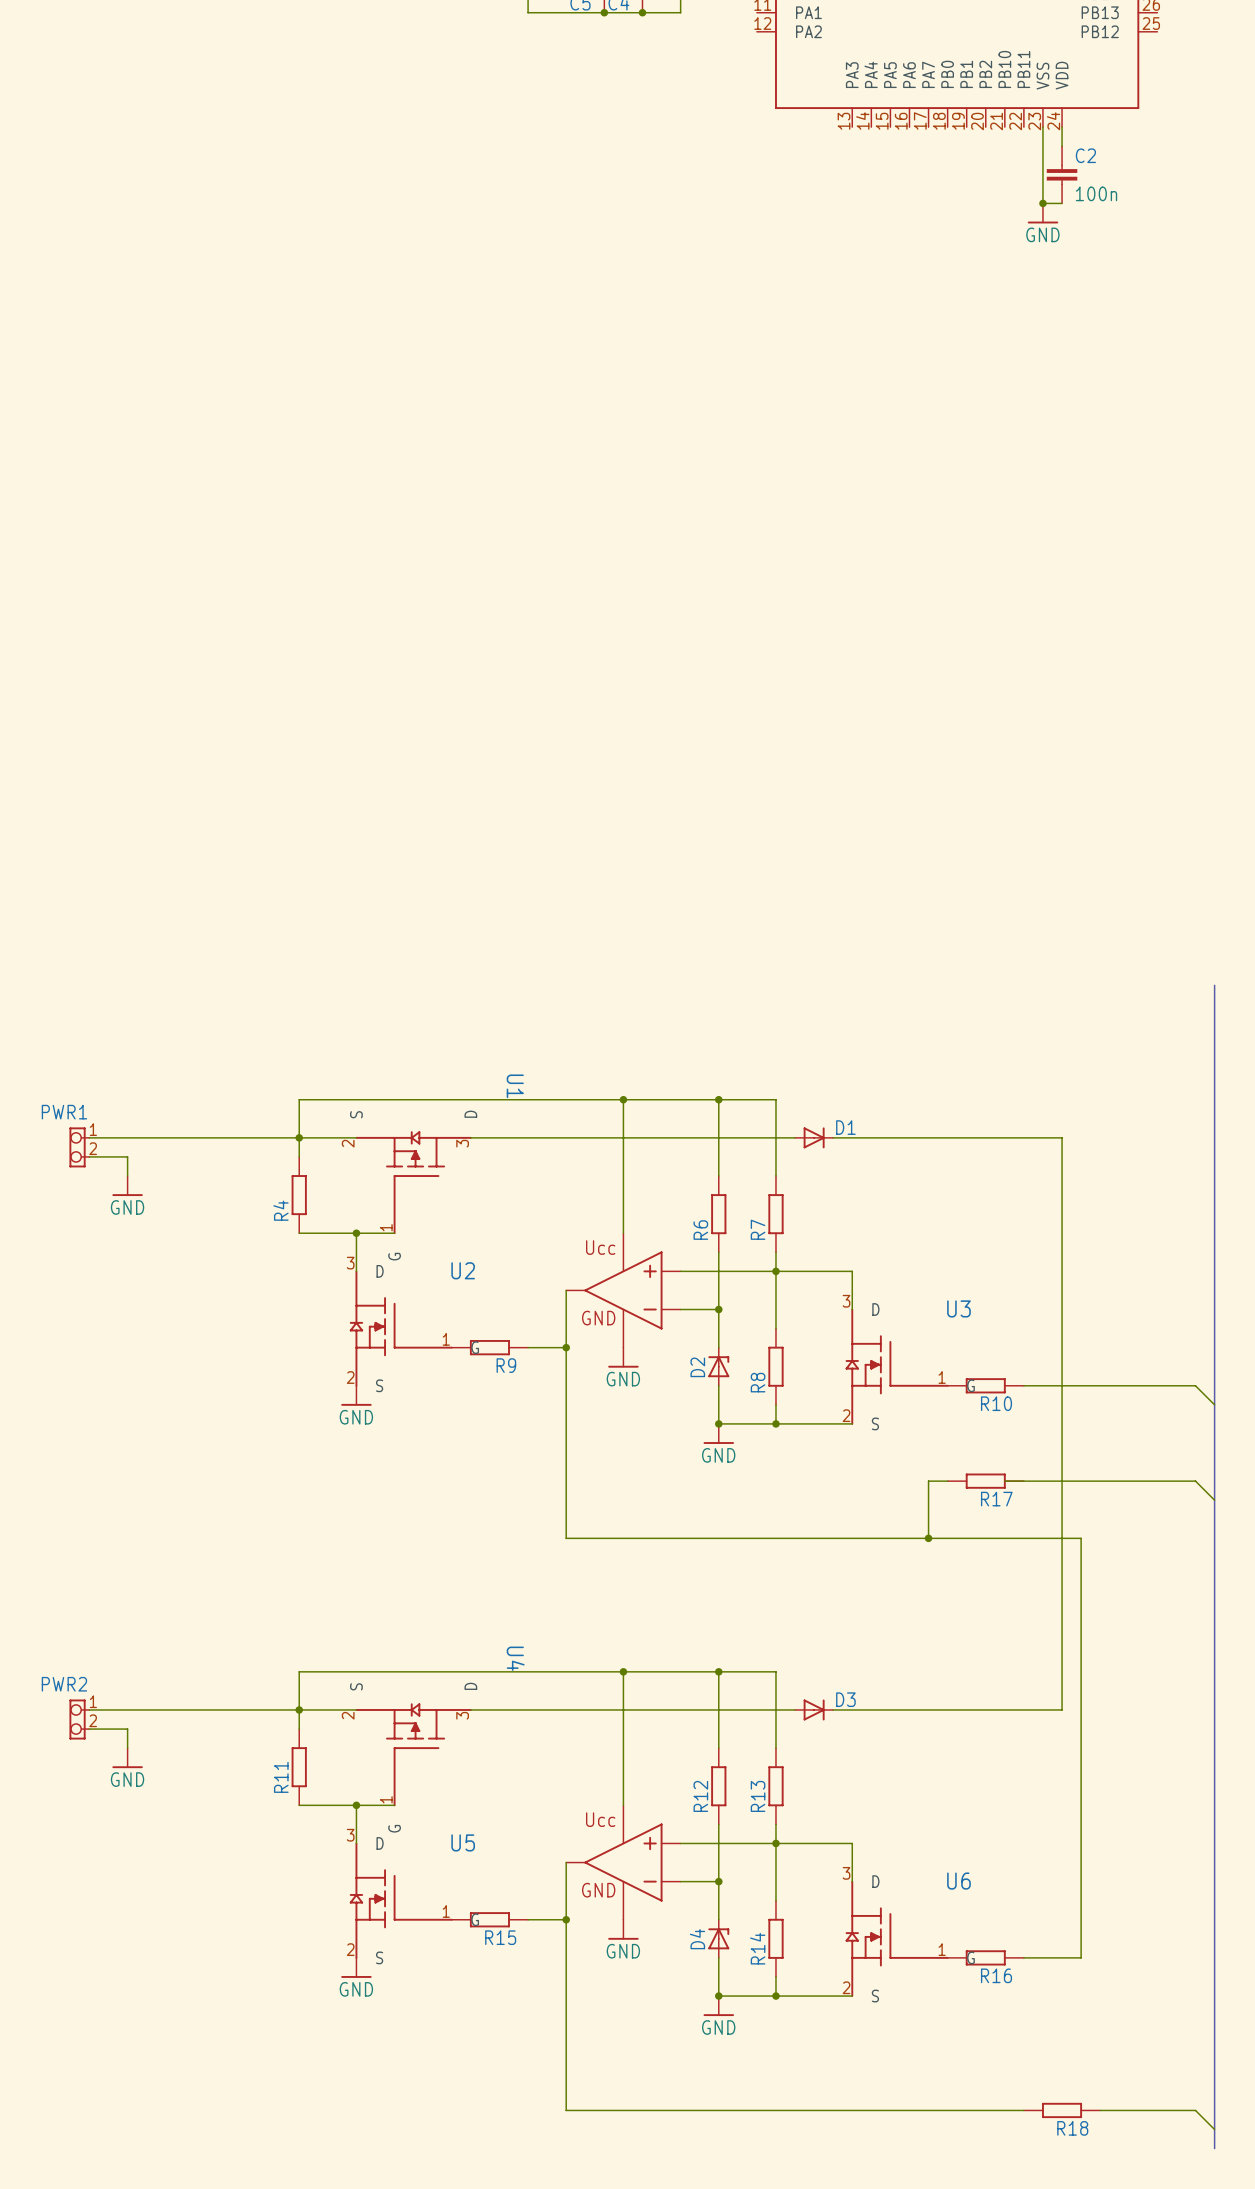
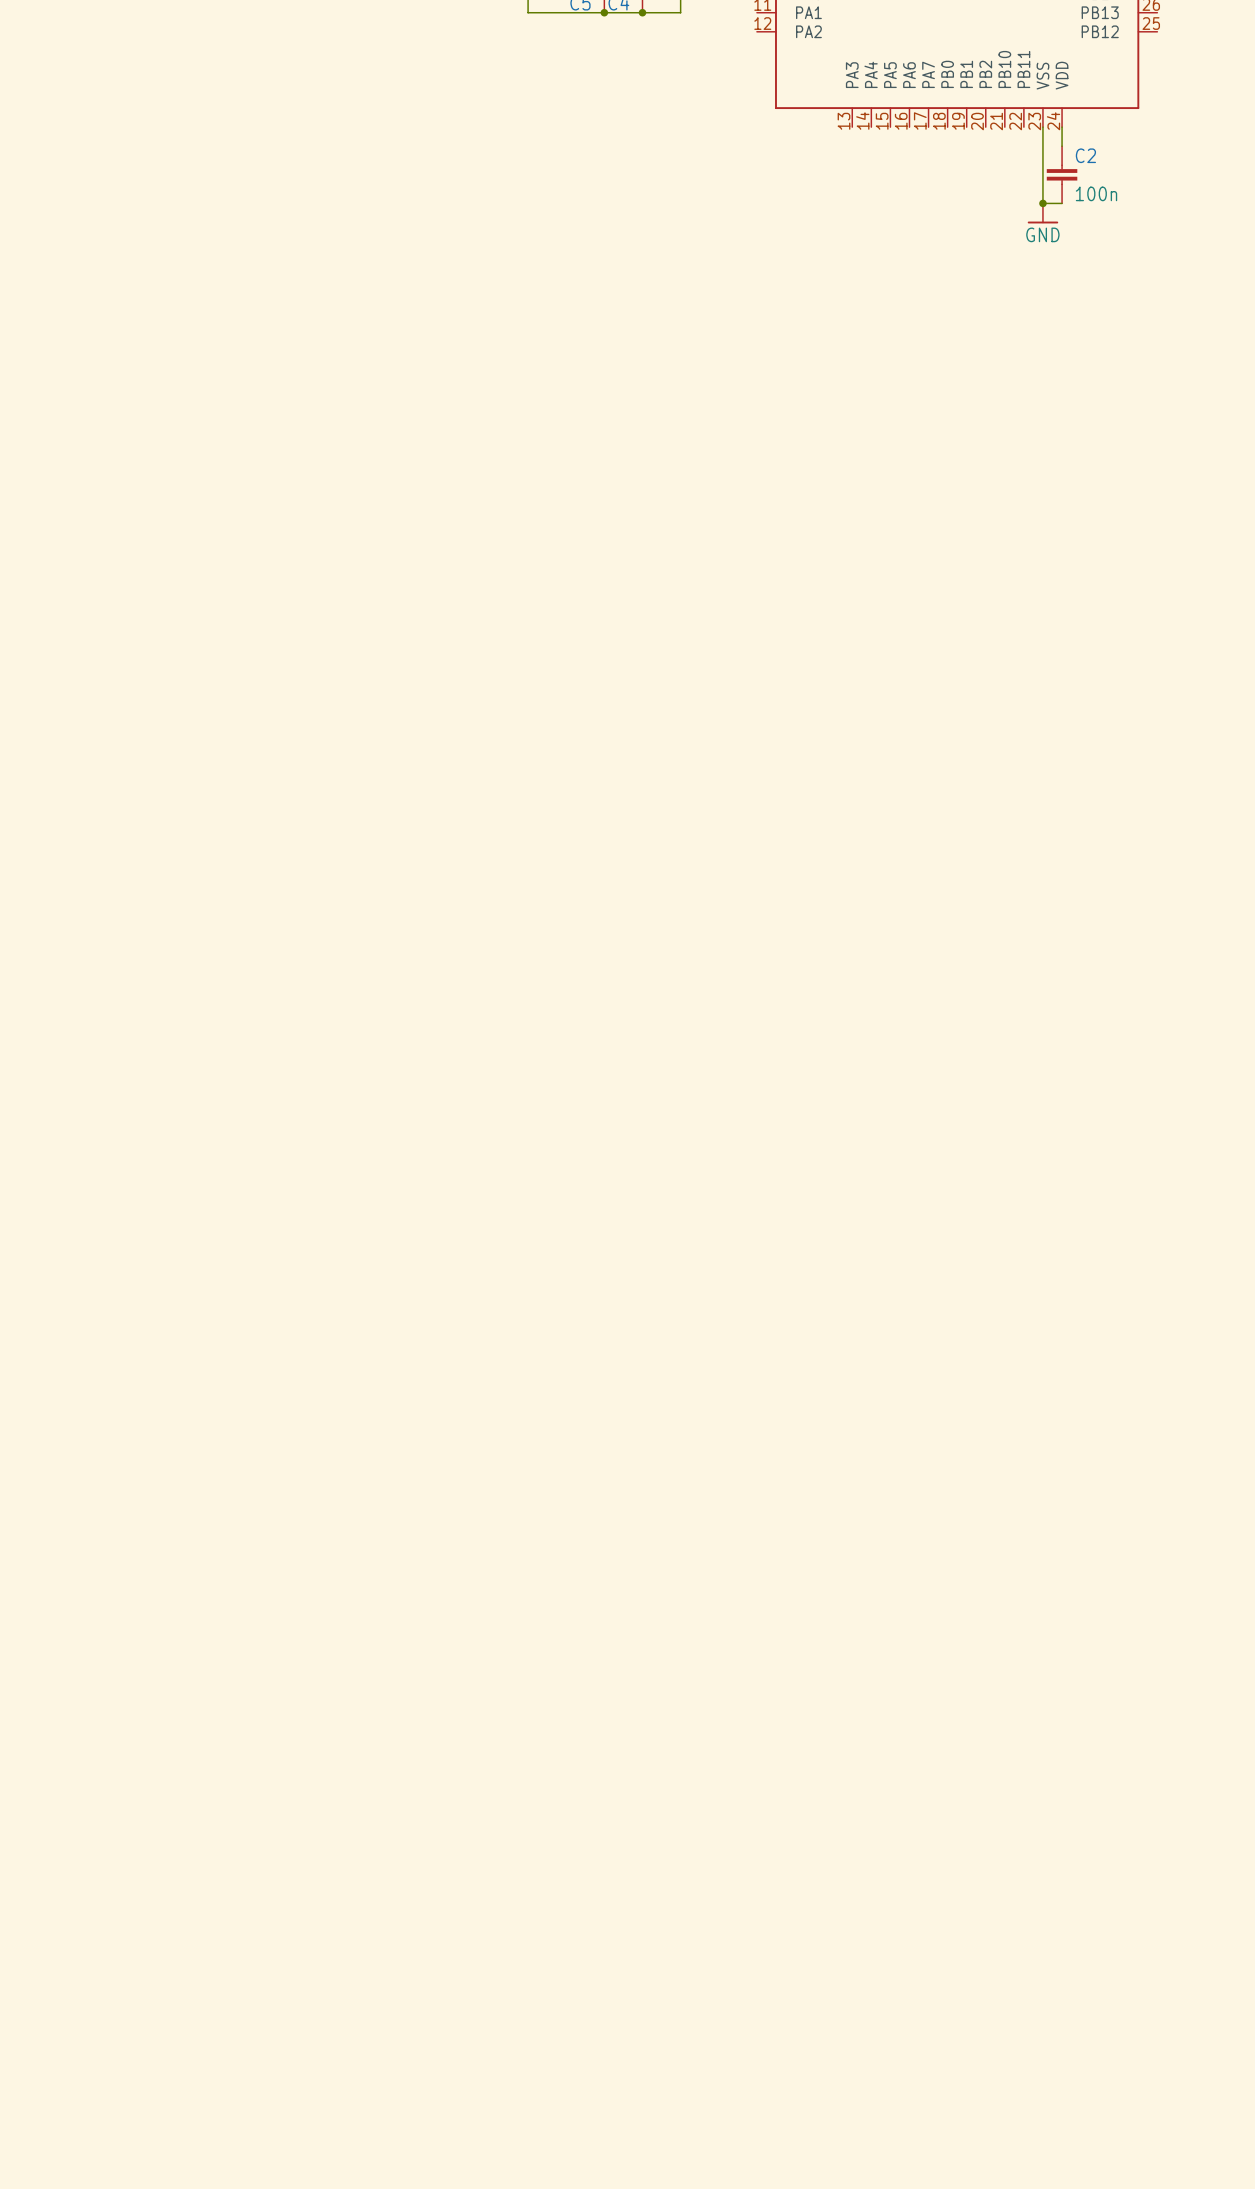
bus: (1214, 985) (1214, 2148) -> none
wire: (623, 1099) (623, 1233) -> none
junction: (623, 1099) -> none
wire: (718, 1099) (718, 1176) -> none
junction: (718, 1099) -> none
wire: (89, 1137) (356, 1137) -> none
junction: (299, 1137) -> none
wire: (470, 1137) (795, 1137) -> none
D1: (814, 1137) -> none
wire: (833, 1137) (1062, 1137) (1062, 1709) (833, 1709) -> none
PWR1: (79, 1147) -> none
wire: (89, 1156) (127, 1156) (127, 1176) -> none
wire: (299, 1156) (299, 1099) (775, 1099) (775, 1176) -> none
U1: (413, 1182) -> none
power symbol: GND (127, 1186) -> none
R4: (299, 1195) -> none
R6: (718, 1214) -> none
R7: (775, 1214) -> none
wire: (299, 1233) (394, 1233) -> none
wire: (356, 1233) (356, 1271) -> none
junction: (356, 1233) -> none
wire: (718, 1252) (718, 1347) -> none
wire: (775, 1252) (775, 1328) -> none
wire: (680, 1271) (852, 1271) (852, 1309) -> none
junction: (775, 1271) -> none
wire: (566, 1290) (566, 1538) (1081, 1538) (1081, 1957) (1023, 1957) -> none
part: (623, 1290) -> none
wire: (680, 1309) (718, 1309) -> none
junction: (718, 1309) -> none
U2: (401, 1328) -> none
R9: (489, 1347) -> none
wire: (528, 1347) (566, 1347) -> none
junction: (566, 1347) -> none
power symbol: GND (623, 1357) -> none
D2: (718, 1366) -> none
R8: (775, 1366) -> none
U3: (897, 1366) -> none
wire: (718, 1385) (718, 1423) (852, 1423) -> none
R10: (985, 1385) -> none
wire: (1023, 1385) (1195, 1385) (1214, 1404) -> none
power symbol: GND (356, 1395) -> none
wire: (775, 1404) (775, 1423) -> none
junction: (718, 1423) -> none
junction: (775, 1423) -> none
power symbol: GND (718, 1433) -> none
wire: (947, 1481) (928, 1481) (928, 1538) -> none
R17: (985, 1481) -> none
wire: (1004, 1481) (1195, 1481) (1214, 1500) -> none
junction: (928, 1538) -> none
wire: (623, 1671) (623, 1805) -> none
junction: (623, 1671) -> none
wire: (718, 1671) (718, 1748) -> none
junction: (718, 1671) -> none
wire: (89, 1709) (356, 1709) -> none
junction: (299, 1709) -> none
wire: (470, 1709) (795, 1709) -> none
D3: (814, 1709) -> none
PWR2: (79, 1719) -> none
wire: (89, 1729) (127, 1729) (127, 1748) -> none
wire: (299, 1729) (299, 1671) (775, 1671) (775, 1748) -> none
U4: (413, 1754) -> none
power symbol: GND (127, 1758) -> none
R11: (299, 1767) -> none
R12: (718, 1786) -> none
R13: (775, 1786) -> none
wire: (299, 1805) (394, 1805) -> none
wire: (356, 1805) (356, 1843) -> none
junction: (356, 1805) -> none
wire: (718, 1824) (718, 1919) -> none
wire: (775, 1824) (775, 1900) -> none
wire: (680, 1843) (852, 1843) (852, 1881) -> none
junction: (775, 1843) -> none
wire: (566, 1862) (566, 2110) (1023, 2110) -> none
part: (623, 1862) -> none
wire: (680, 1881) (718, 1881) -> none
junction: (718, 1881) -> none
U5: (401, 1900) -> none
R15: (489, 1919) -> none
wire: (528, 1919) (566, 1919) -> none
junction: (566, 1919) -> none
power symbol: GND (623, 1929) -> none
D4: (718, 1938) -> none
R14: (775, 1938) -> none
U6: (897, 1938) -> none
wire: (718, 1957) (718, 1996) (852, 1996) -> none
R16: (985, 1957) -> none
power symbol: GND (356, 1967) -> none
wire: (775, 1976) (775, 1996) -> none
junction: (718, 1996) -> none
junction: (775, 1996) -> none
power symbol: GND (718, 2006) -> none
R18: (1062, 2110) -> none
wire: (1100, 2110) (1195, 2110) (1214, 2129) -> none

